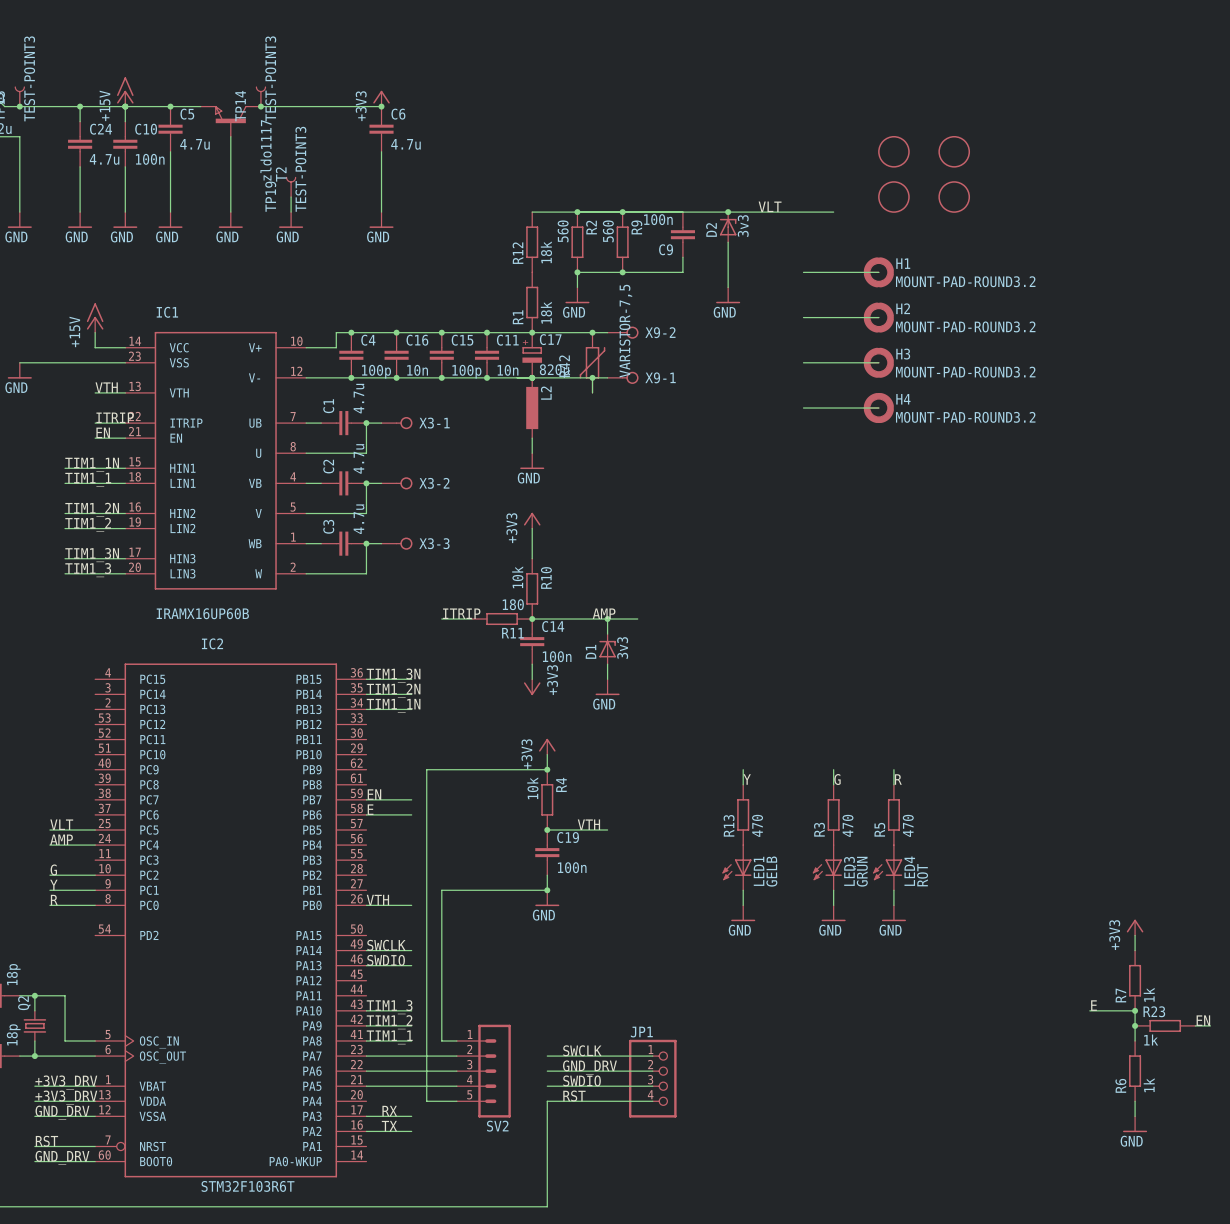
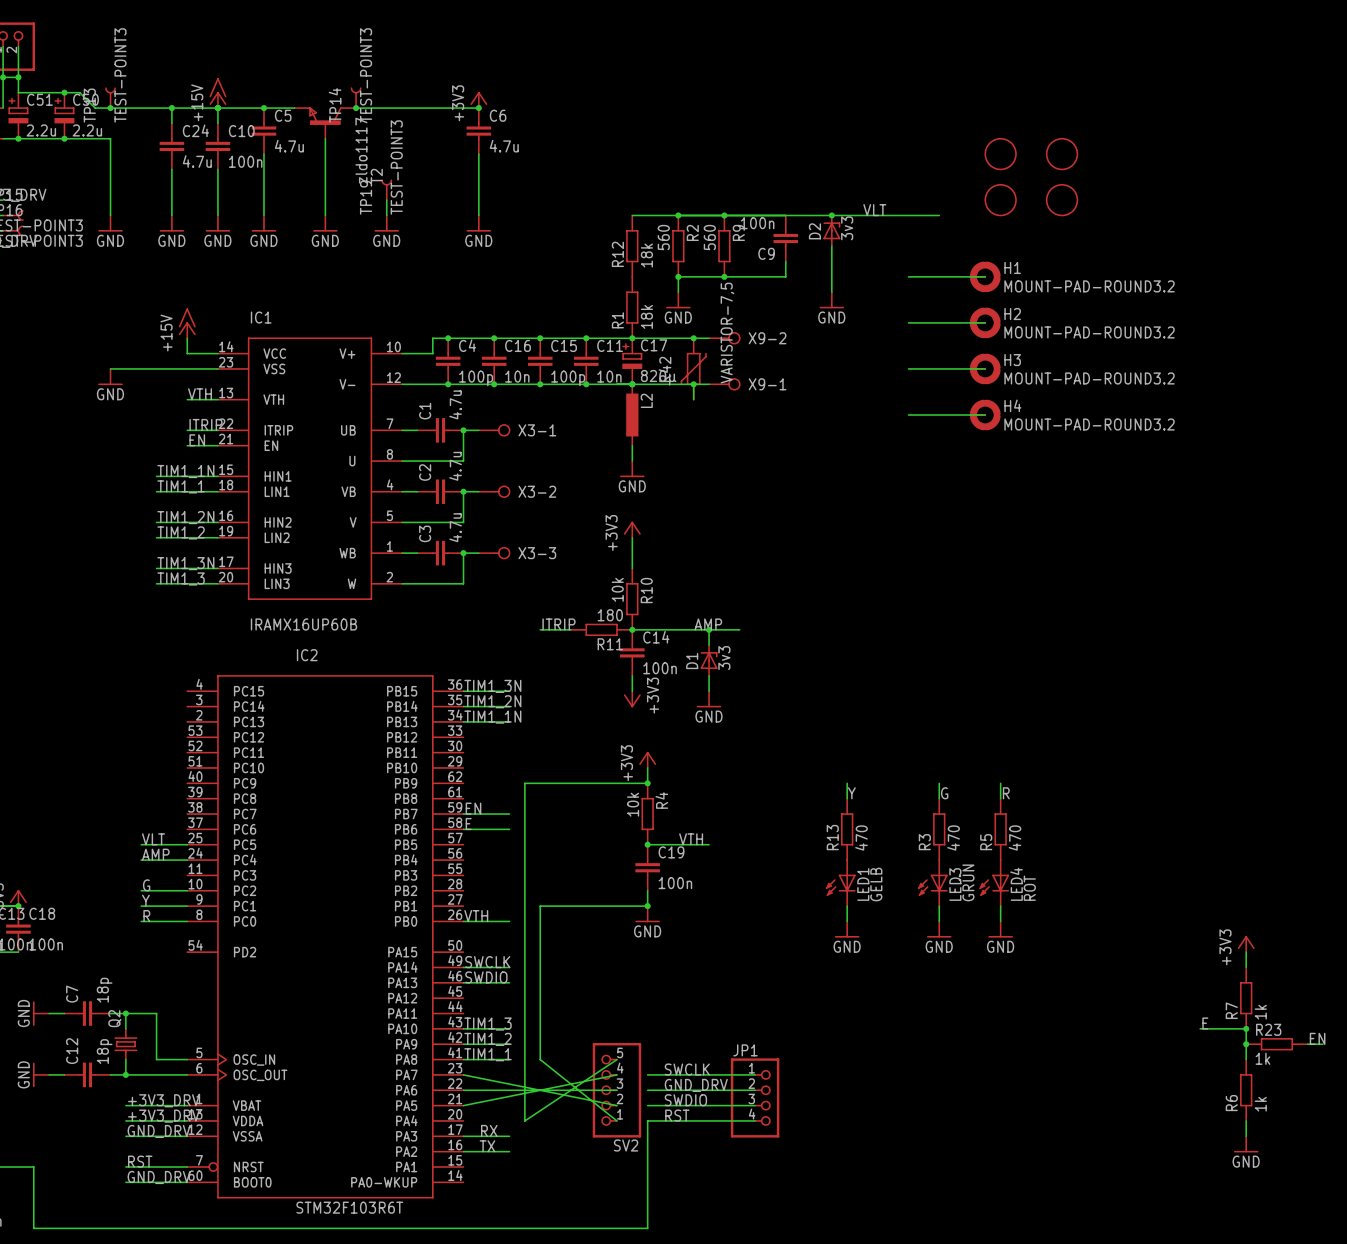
SV2 symbol: [456, 1024, 511, 1118] -> [592, 1043, 642, 1138]
wire: (441, 1040) (456, 1040) -> (540, 1059) (616, 1120)
wire: (366, 1056) (456, 1056) -> (463, 1074) (616, 1105)
wire: (366, 1086) (456, 1086) -> (463, 1105) (616, 1074)
wire: (426, 1101) (456, 1101) -> (524, 1120) (616, 1059)

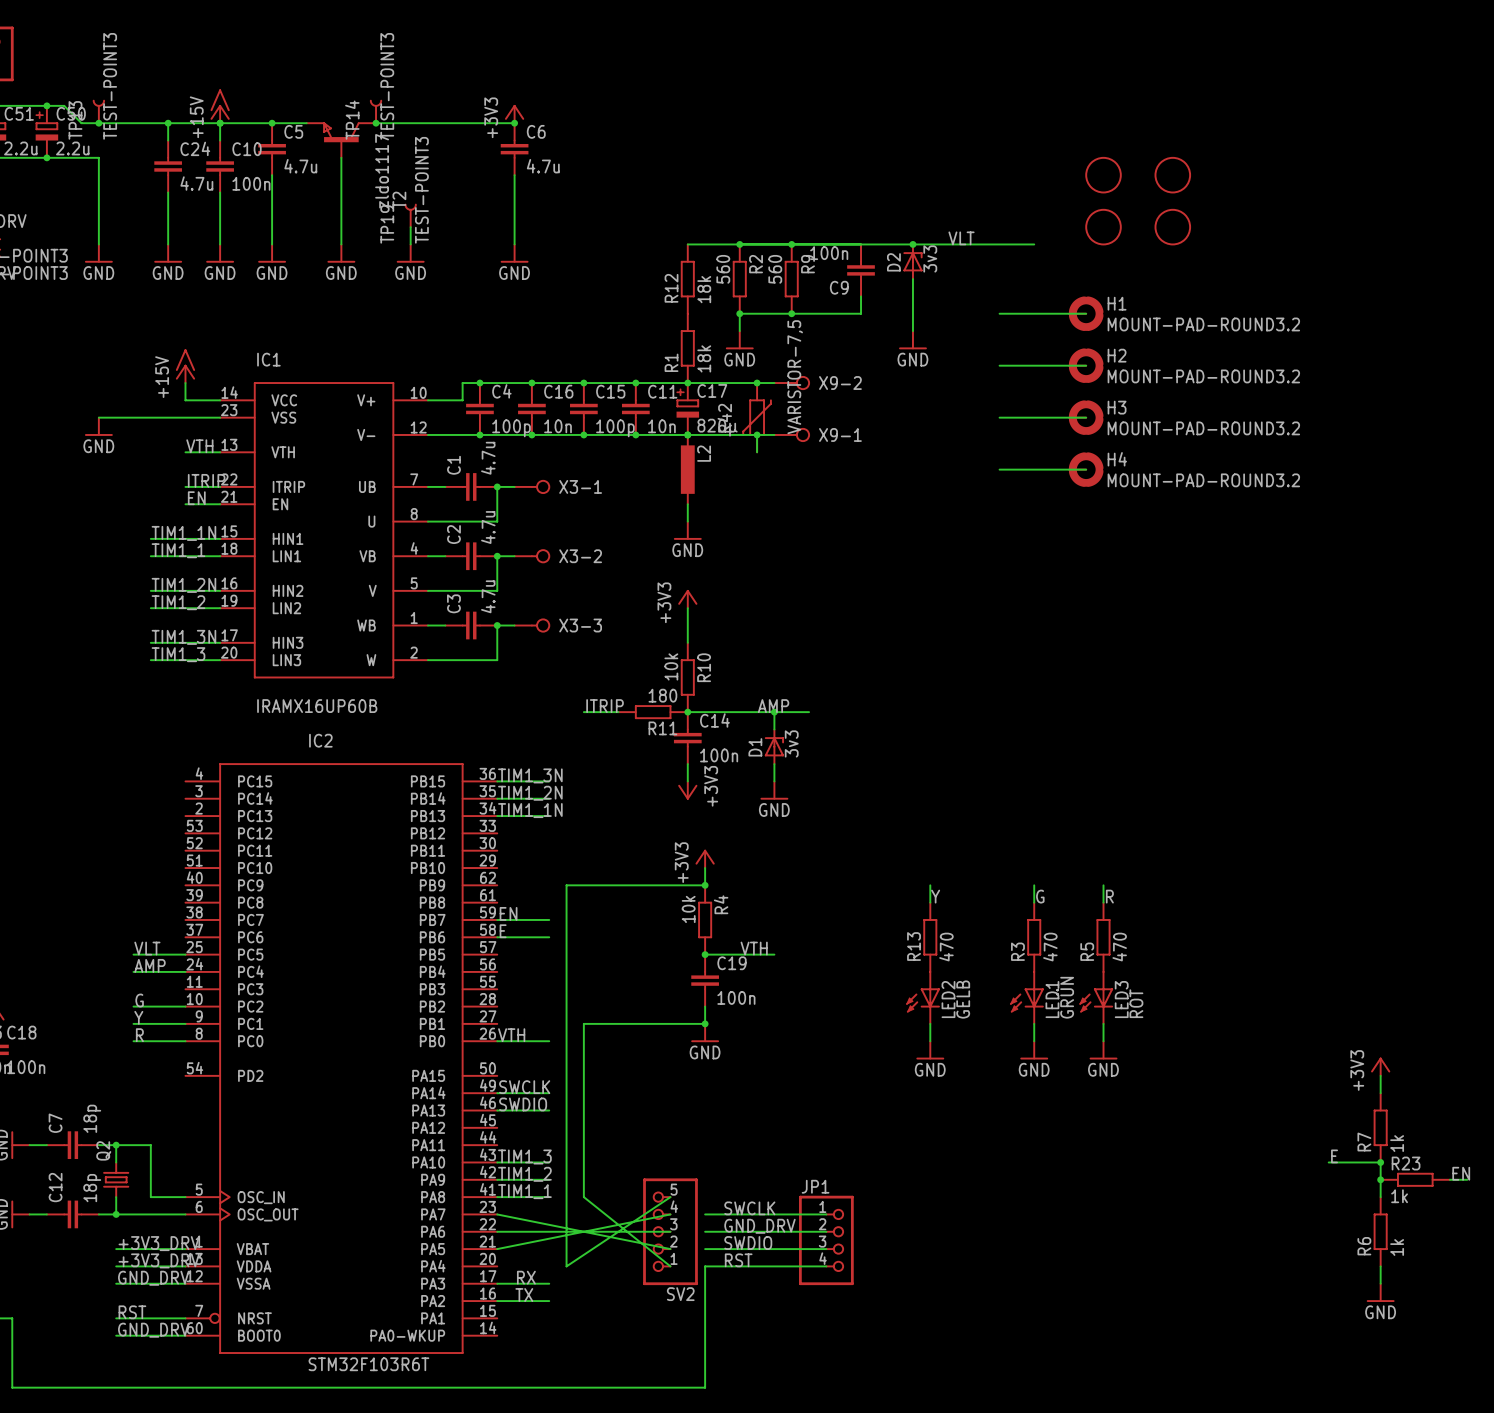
LED1 name: LED1 (863, 884) -> LED2 (948, 999)
LED3 name: LED3 (955, 884) -> LED1 (1052, 999)
LED4 name: LED4 (1016, 884) -> LED3 (1121, 999)

